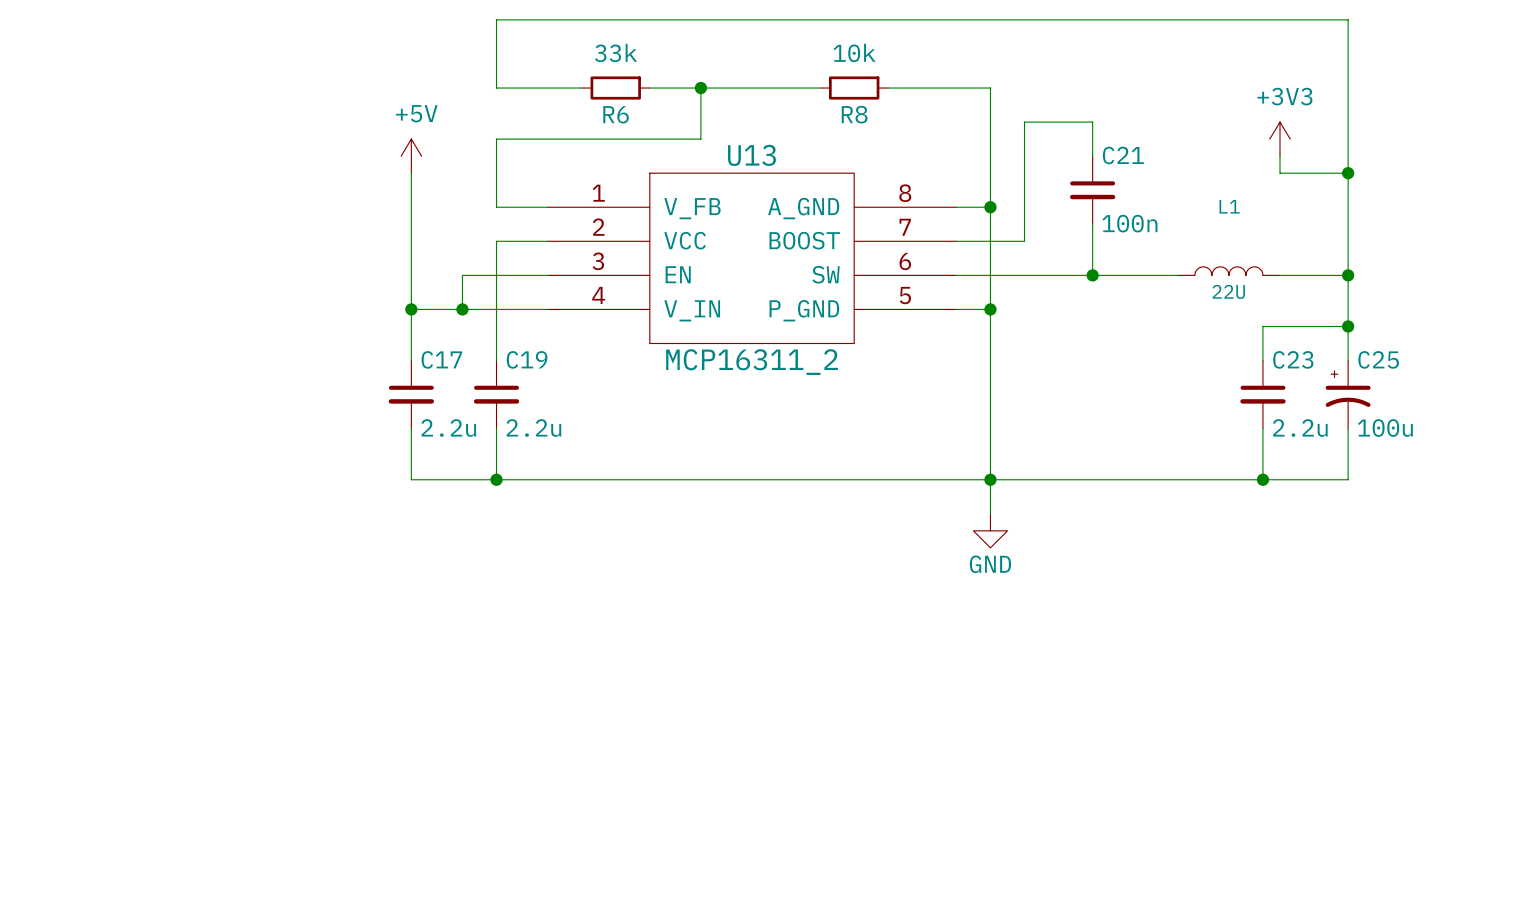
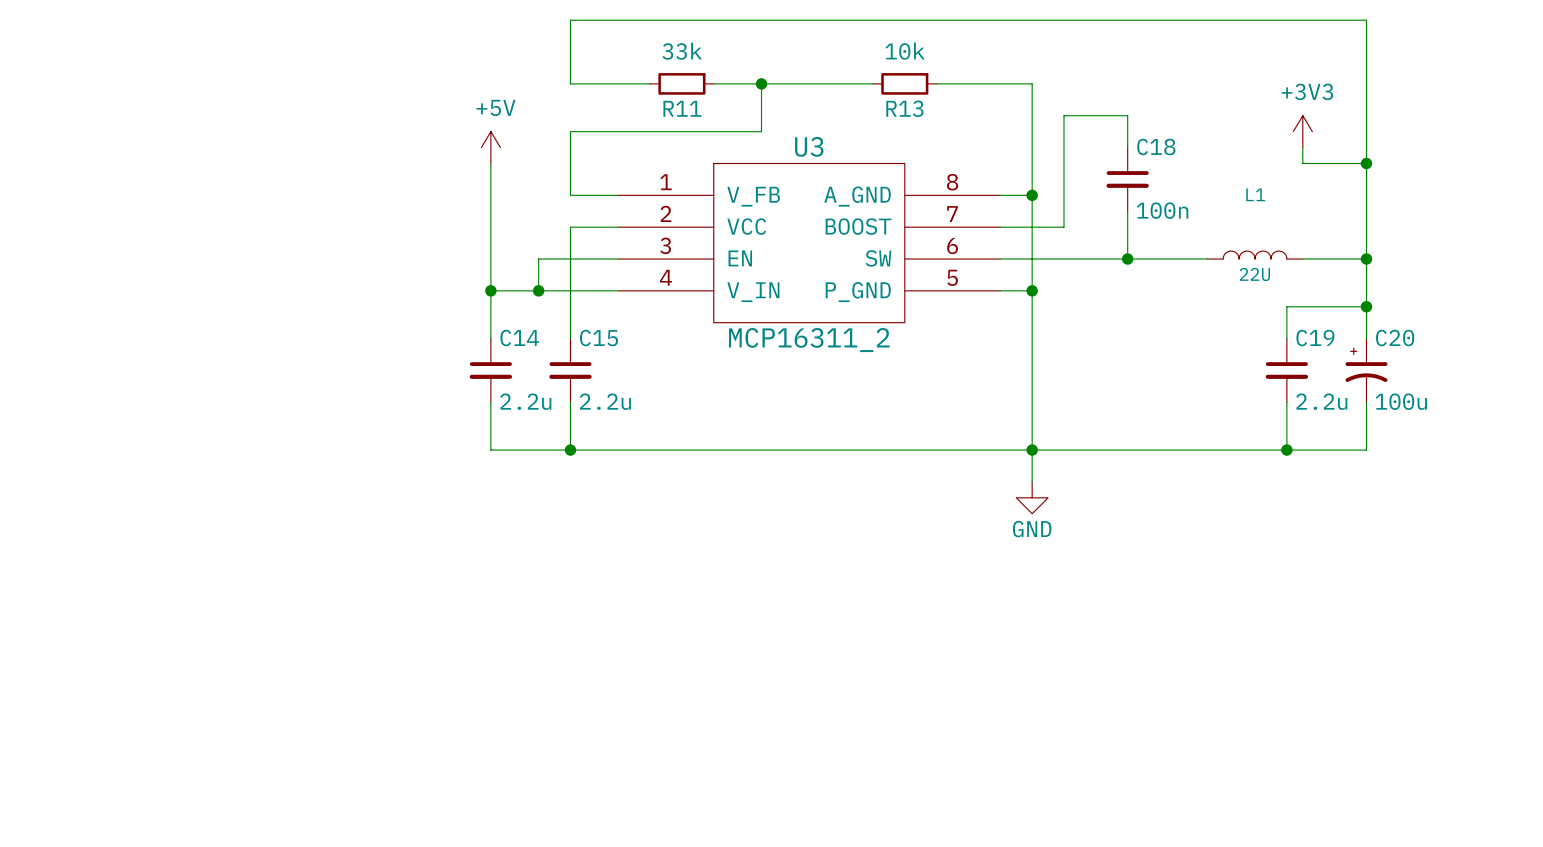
R6 name: R6 (616, 114) -> R11 (682, 108)
R8 name: R8 (854, 114) -> R13 (904, 108)
U13 name: U13 (751, 155) -> U3 (809, 146)
C21 name: C21 (1123, 155) -> C18 (1156, 146)
C17 name: C17 (441, 359) -> C14 (519, 338)
C19 name: C19 (527, 359) -> C15 (599, 338)
C23 name: C23 (1293, 359) -> C19 (1315, 338)
C25 name: C25 (1378, 359) -> C20 (1395, 338)

